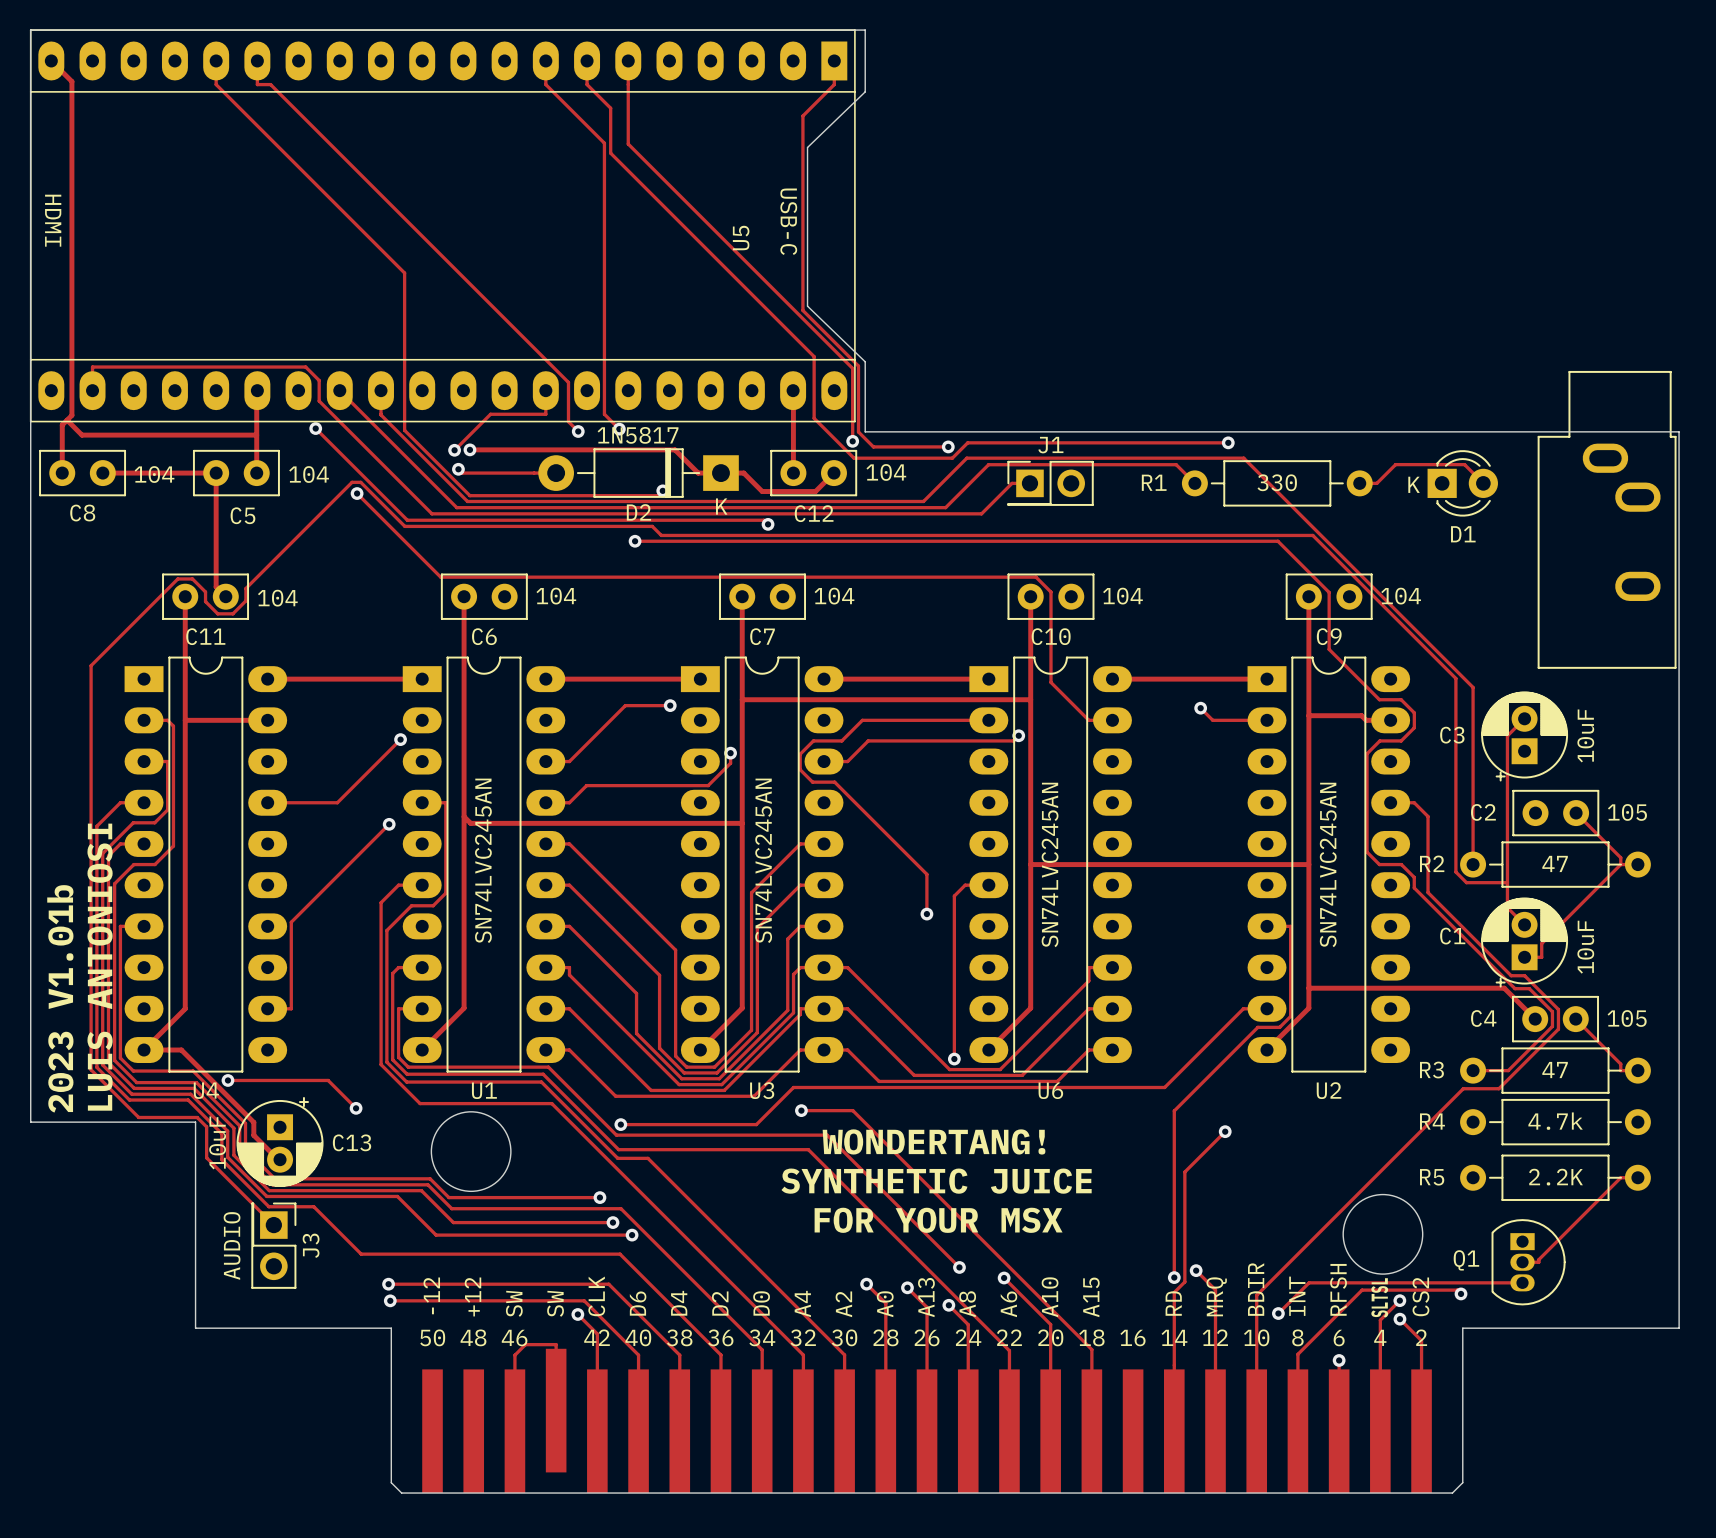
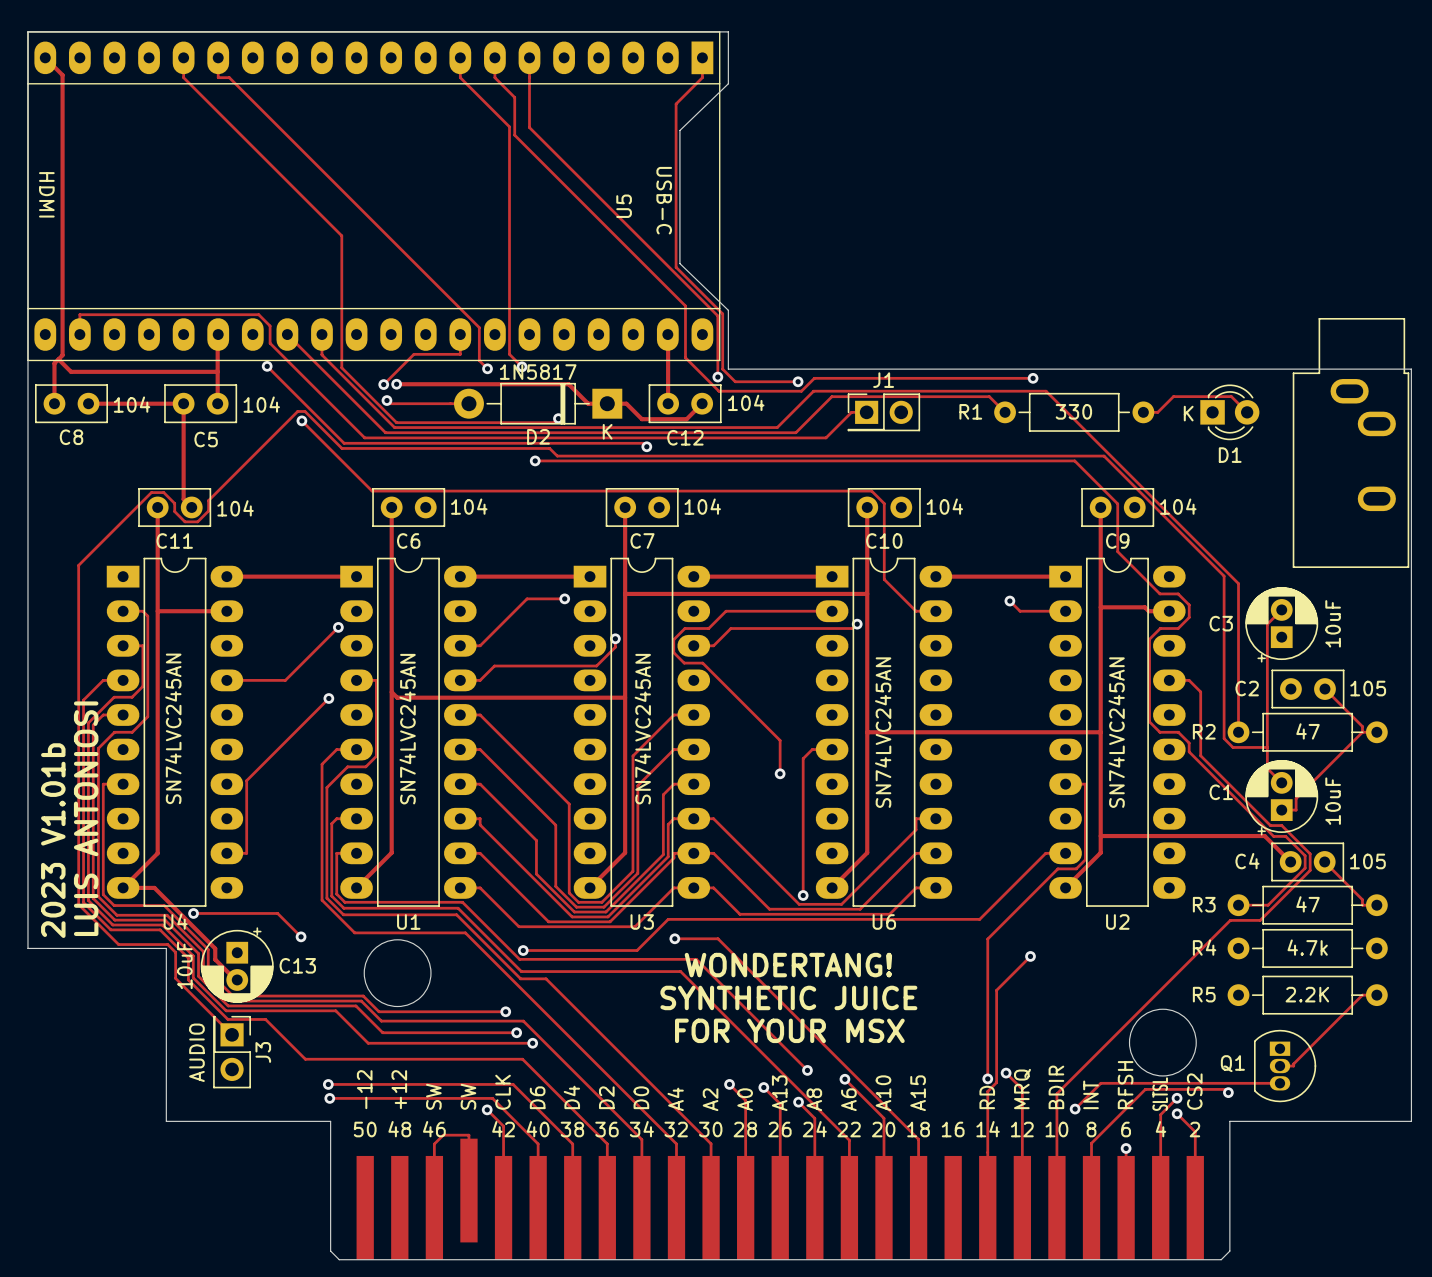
U4 value: none -> SN74LVC245AN (173, 728)

